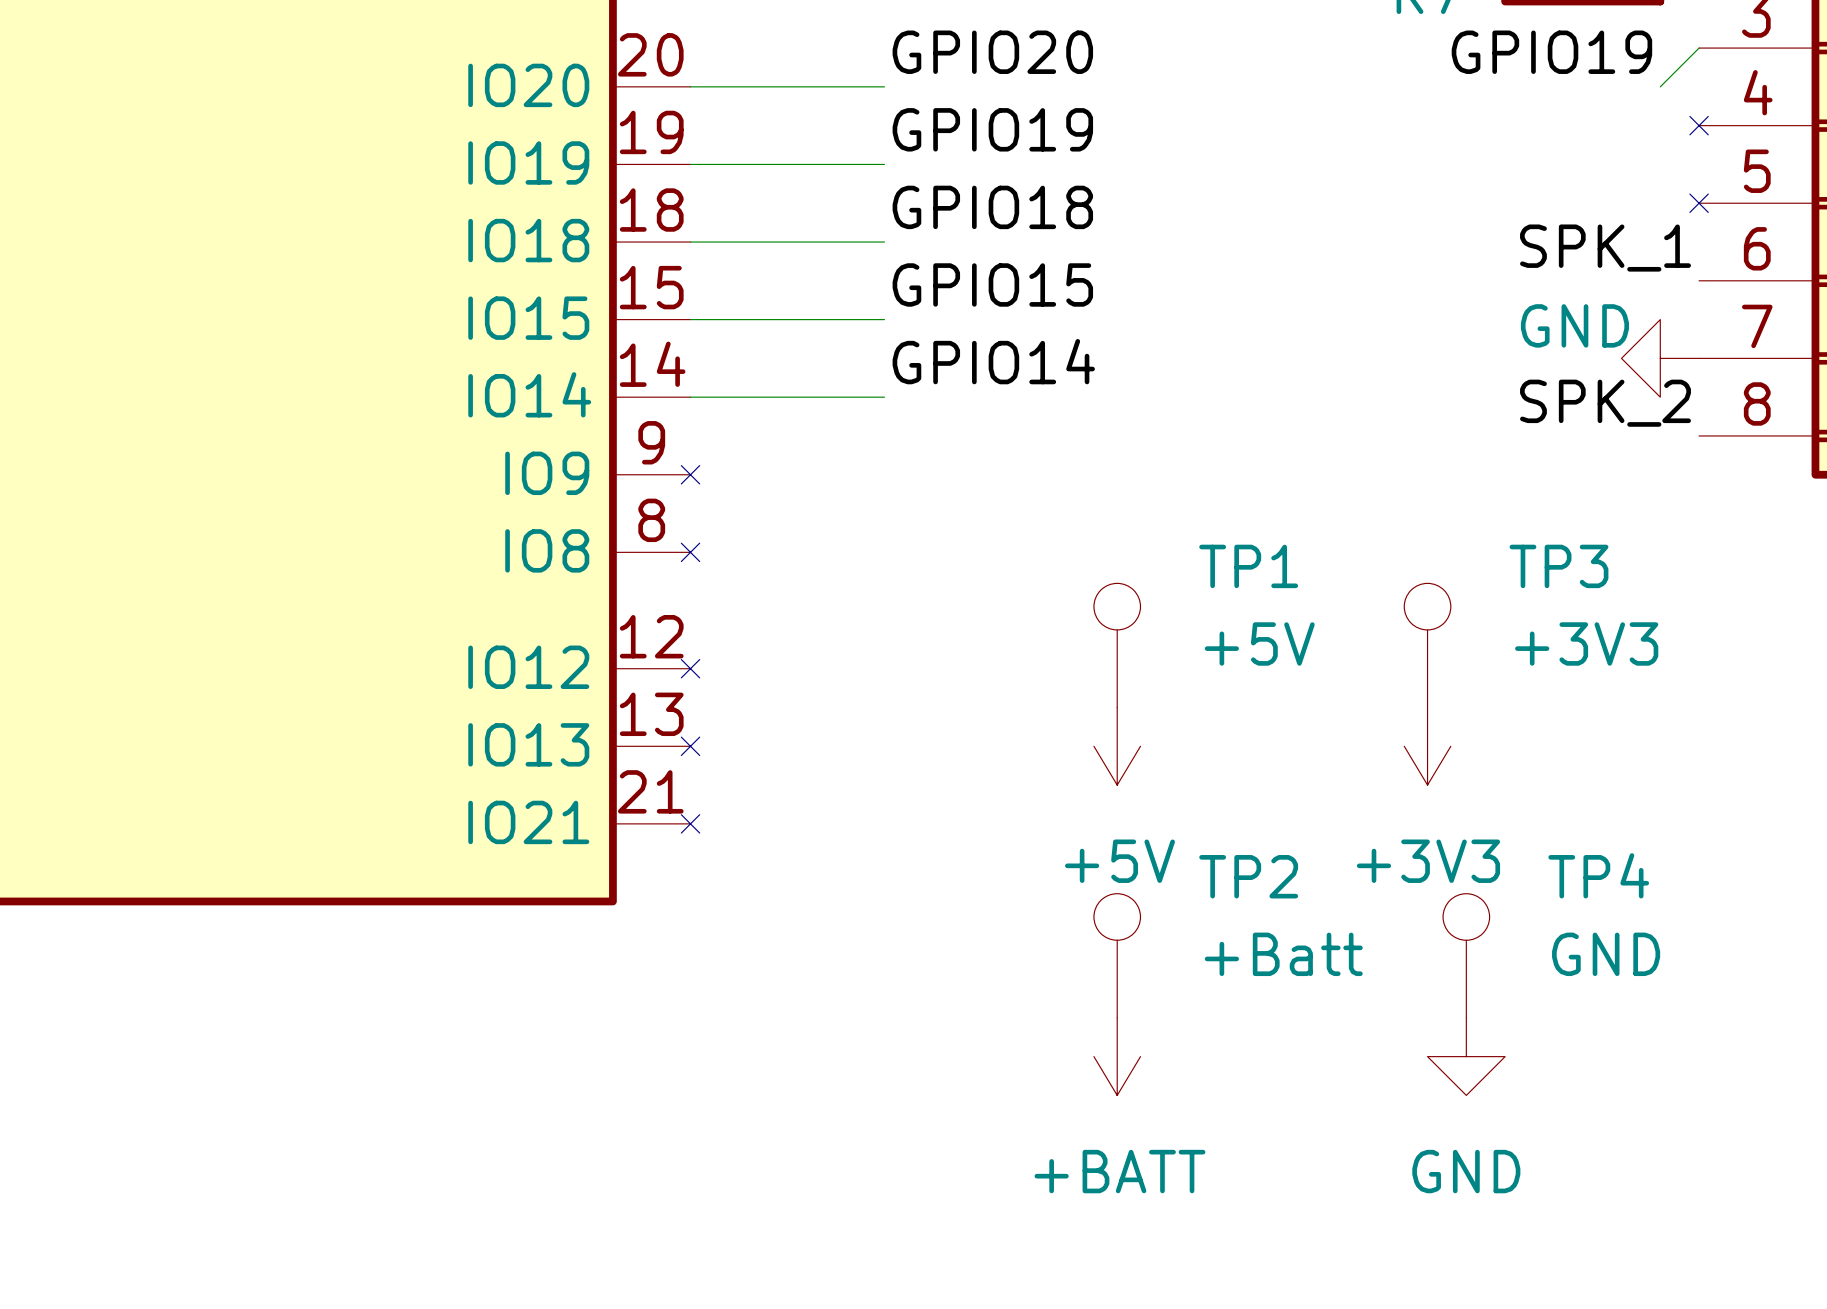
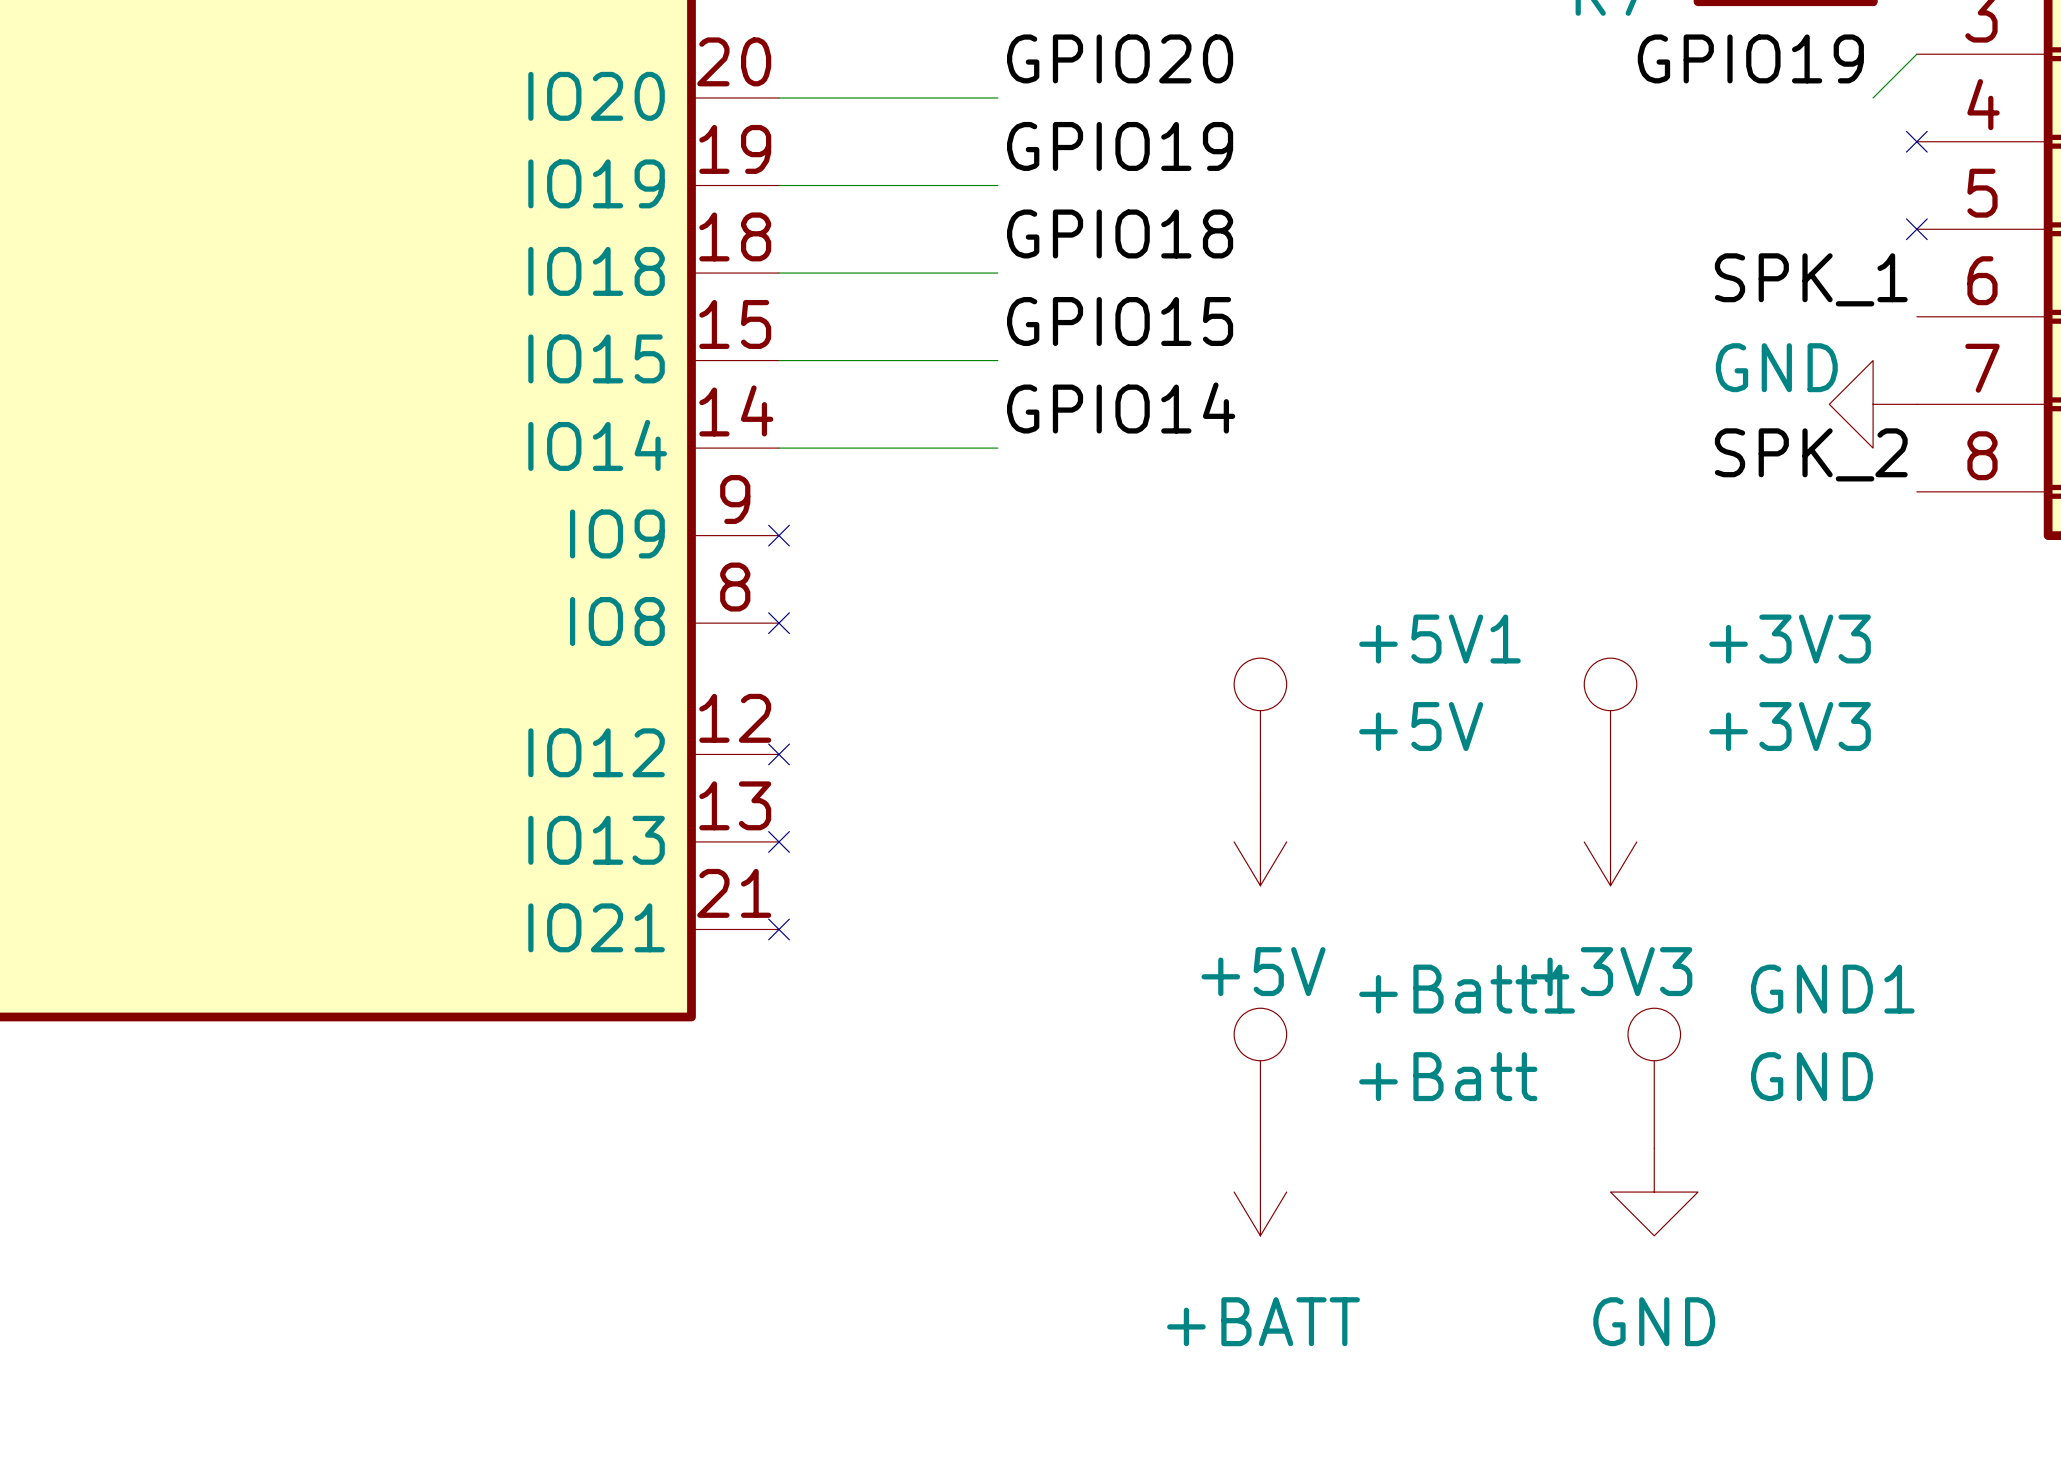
TP1 name: TP1 (1248, 566) -> +5V1 (1439, 639)
TP3 name: TP3 (1558, 566) -> +3V3 (1790, 639)
TP4 name: TP4 (1598, 875) -> GND1 (1832, 989)
TP2 name: TP2 (1248, 876) -> +Batt1 (1467, 989)

